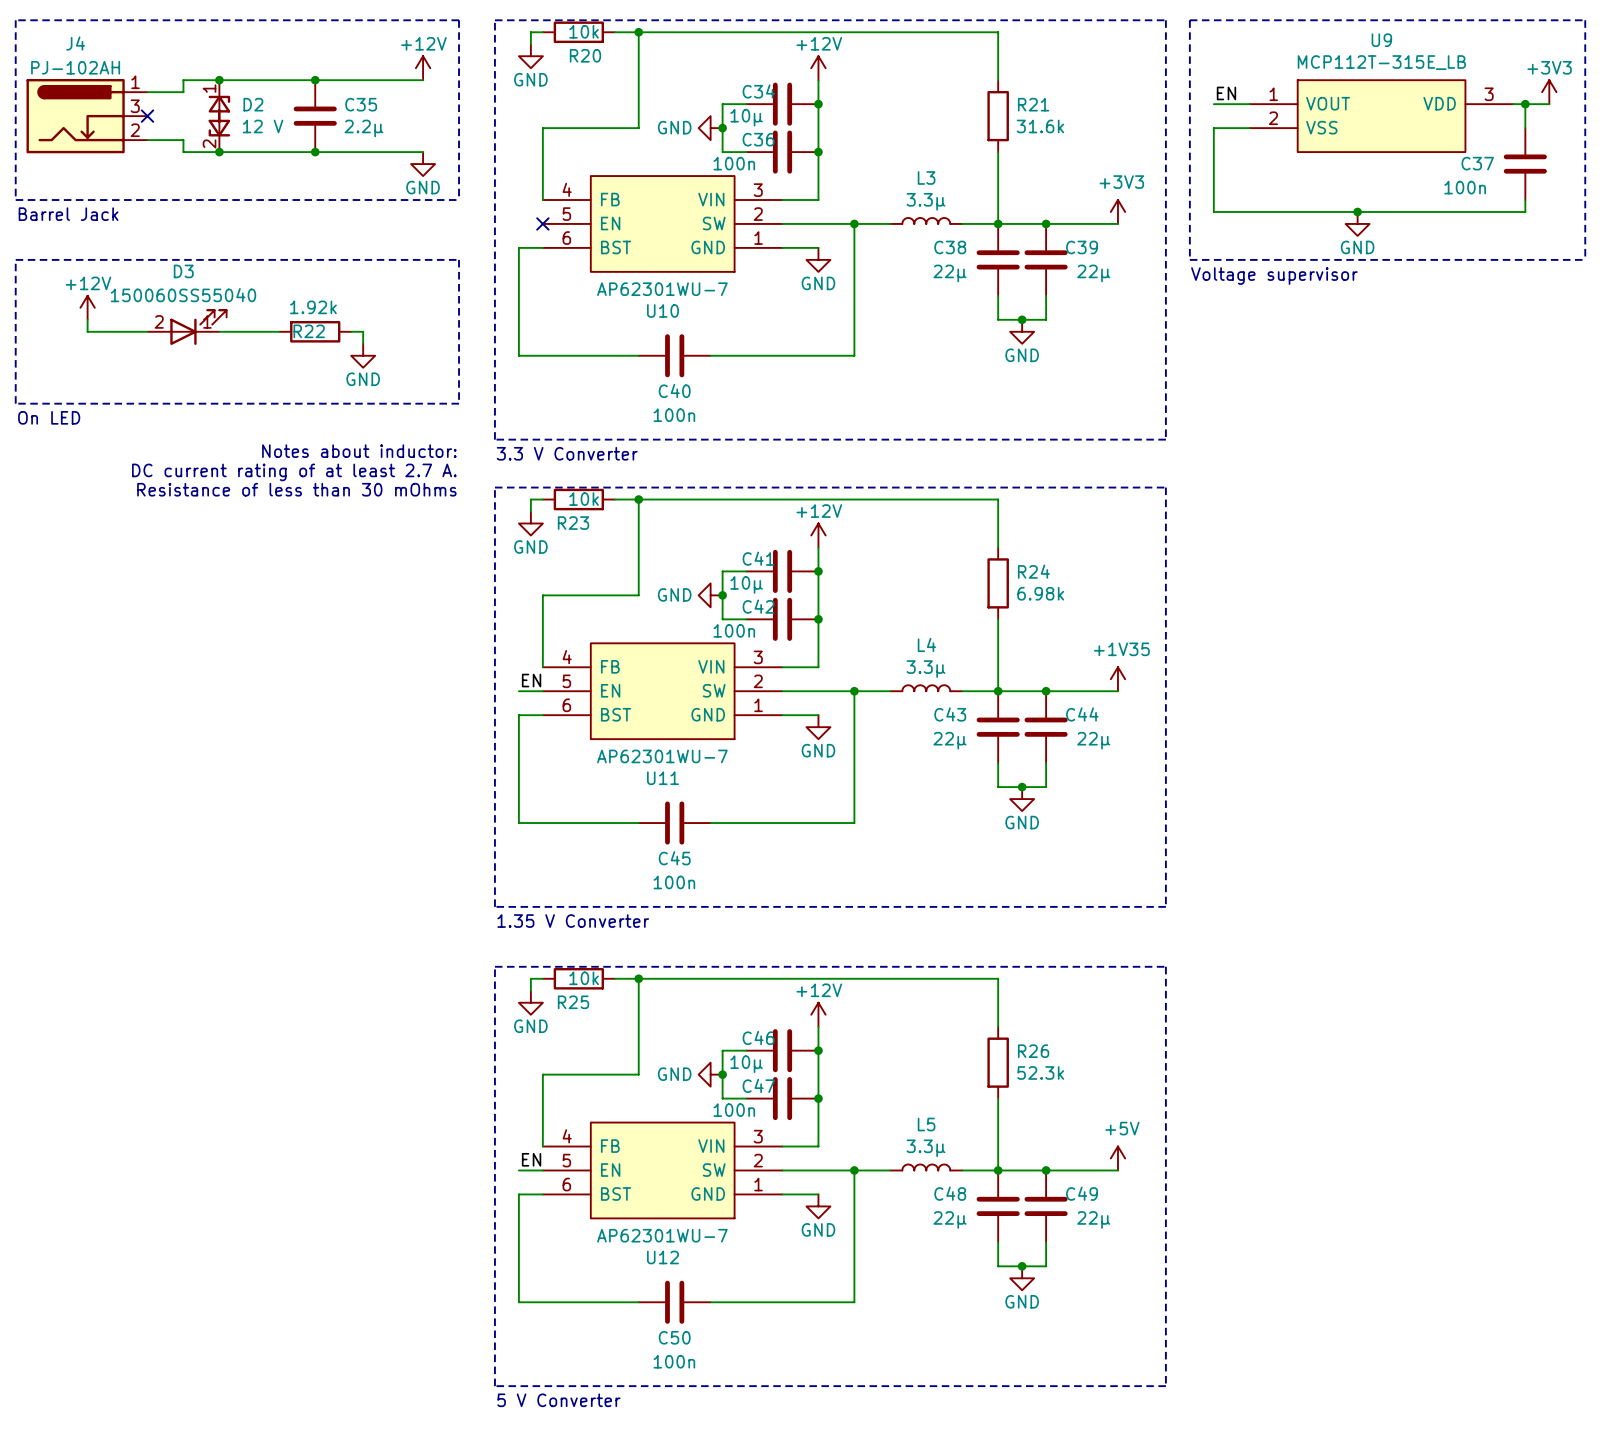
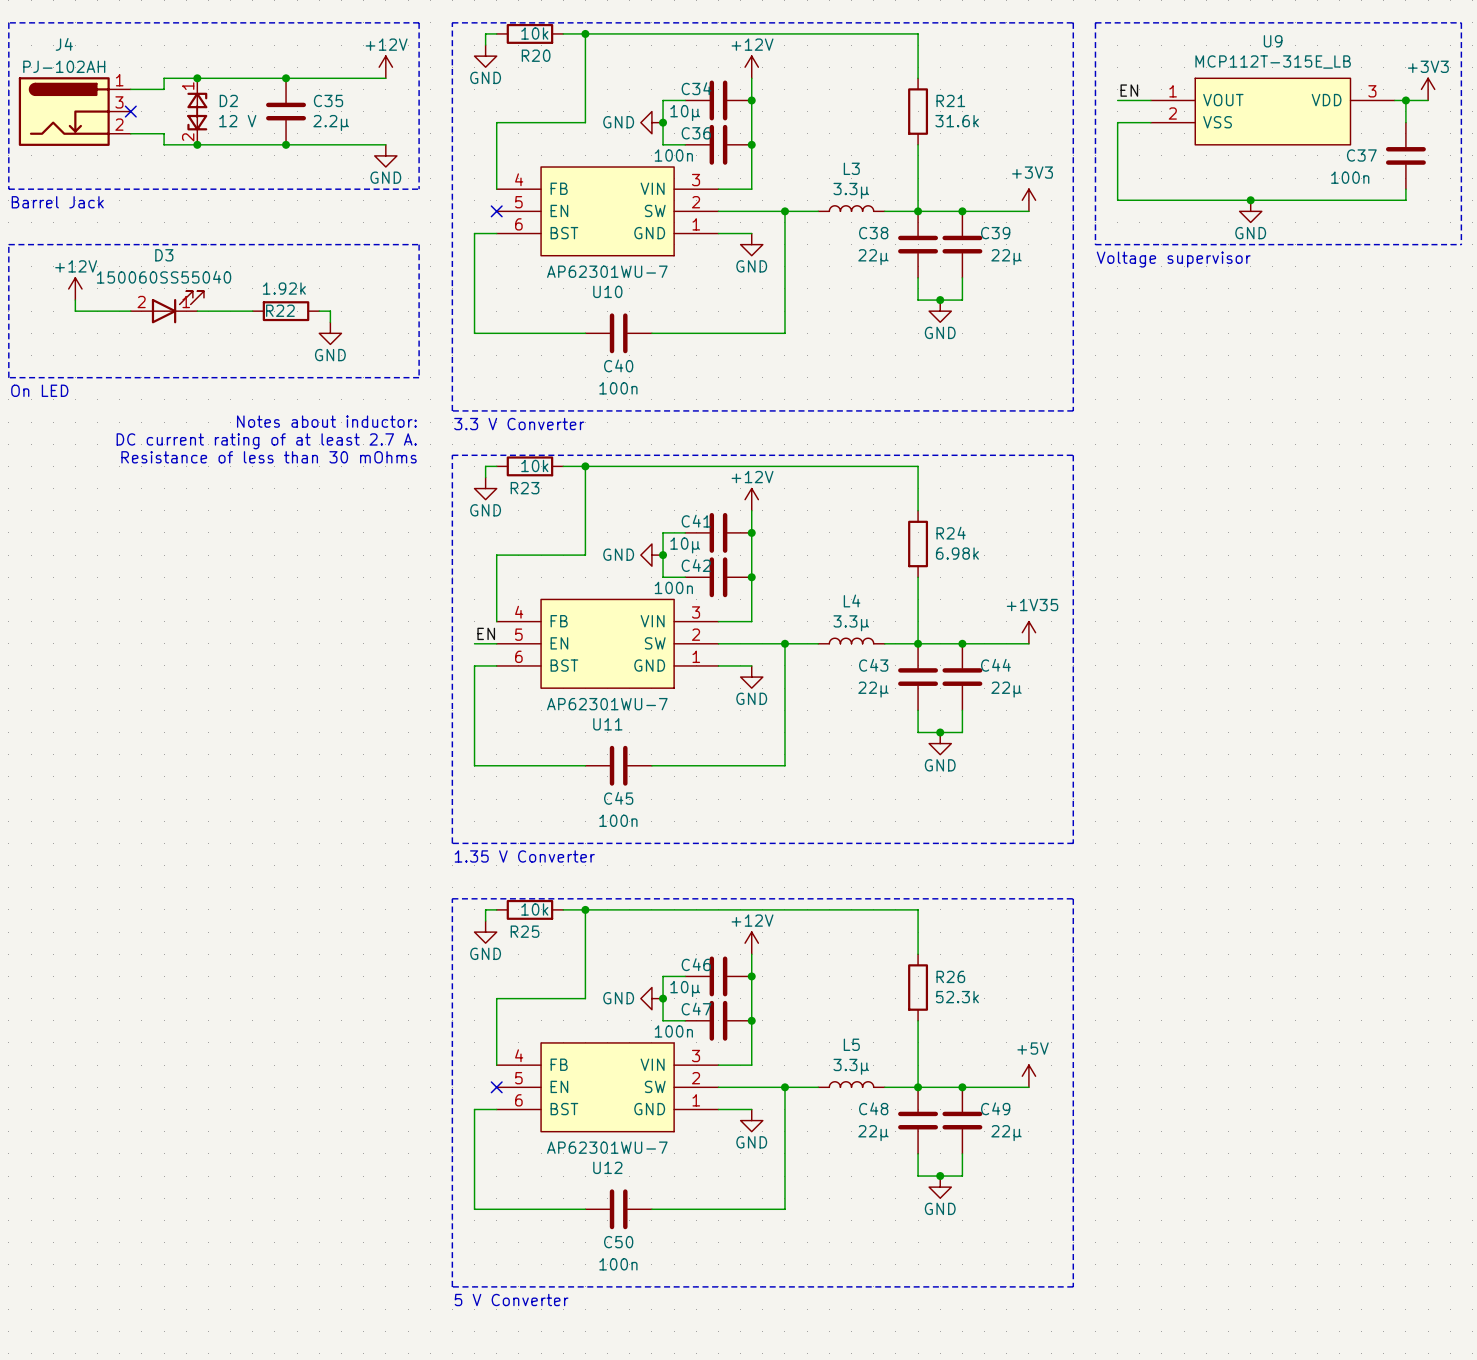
label: EN (531, 1159) -> none
wire: (518, 1170) (542, 1170) -> none
no-connect mark: none -> (496, 1087)

